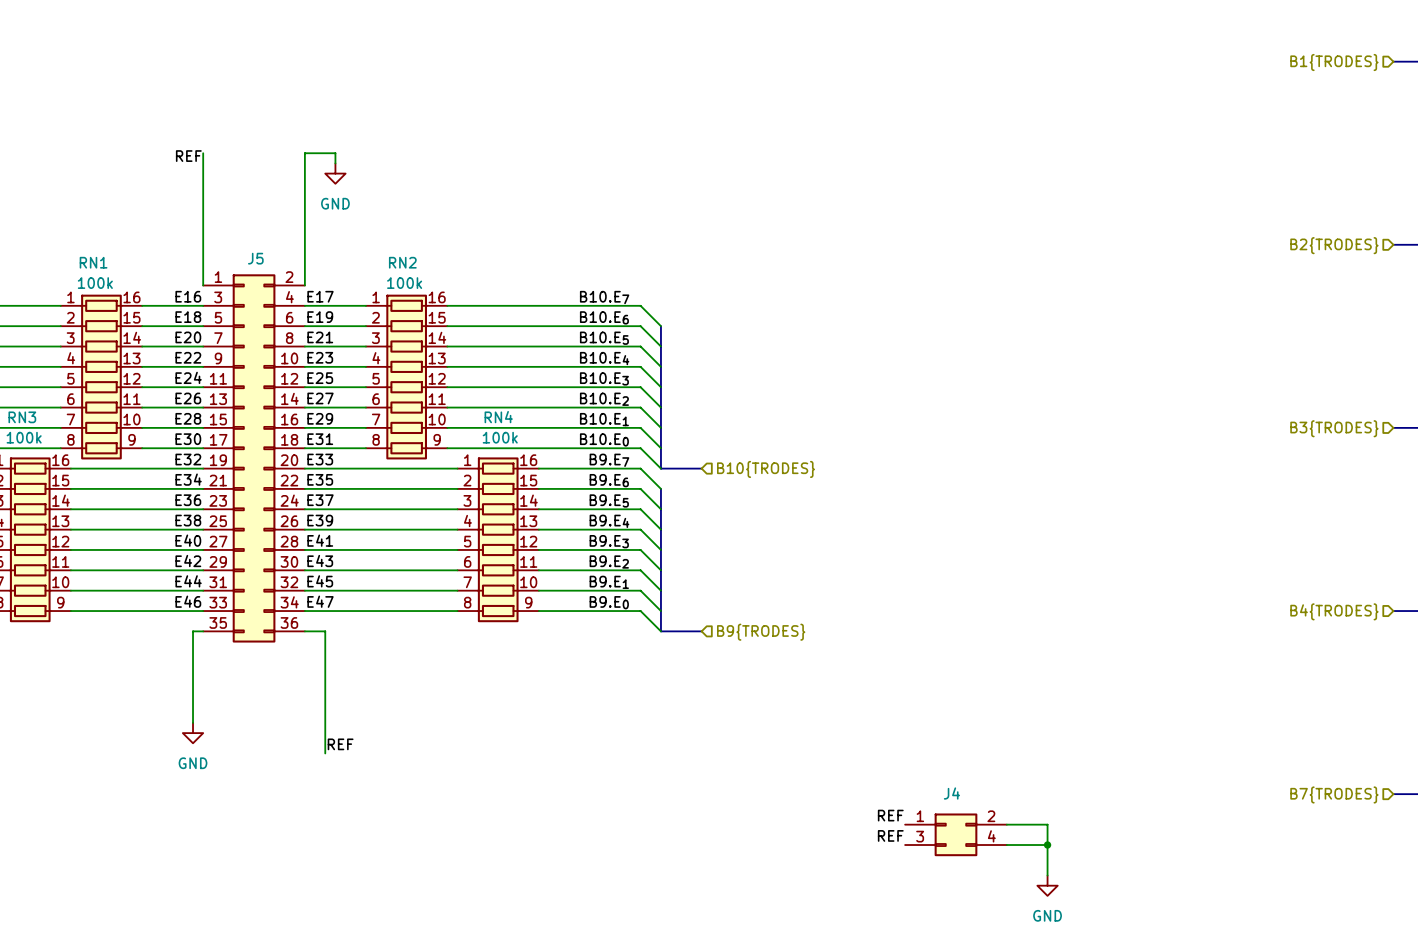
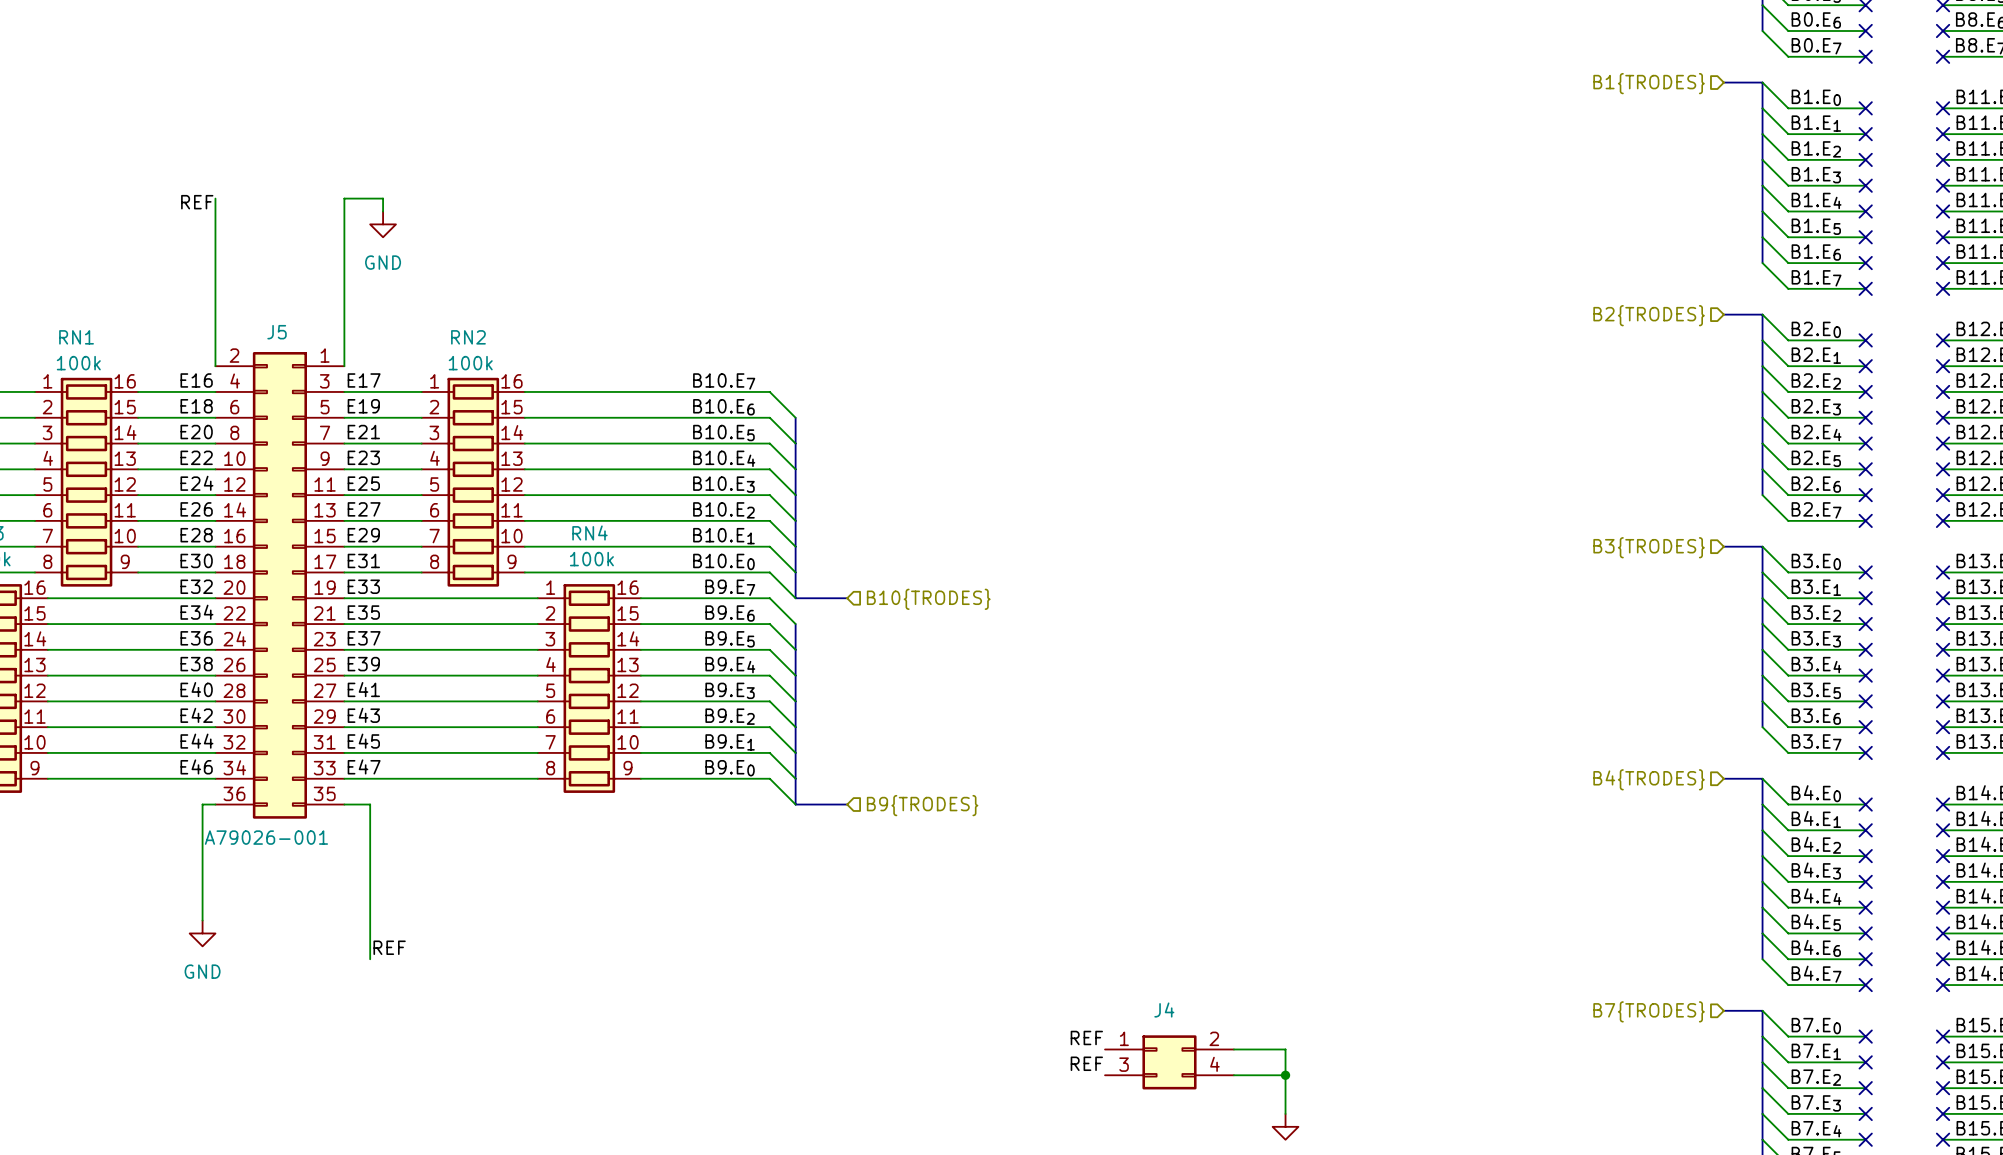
J5 flip: as is (254, 458) -> left-right (279, 585)
J5 value: none -> A79026-001 (266, 837)

